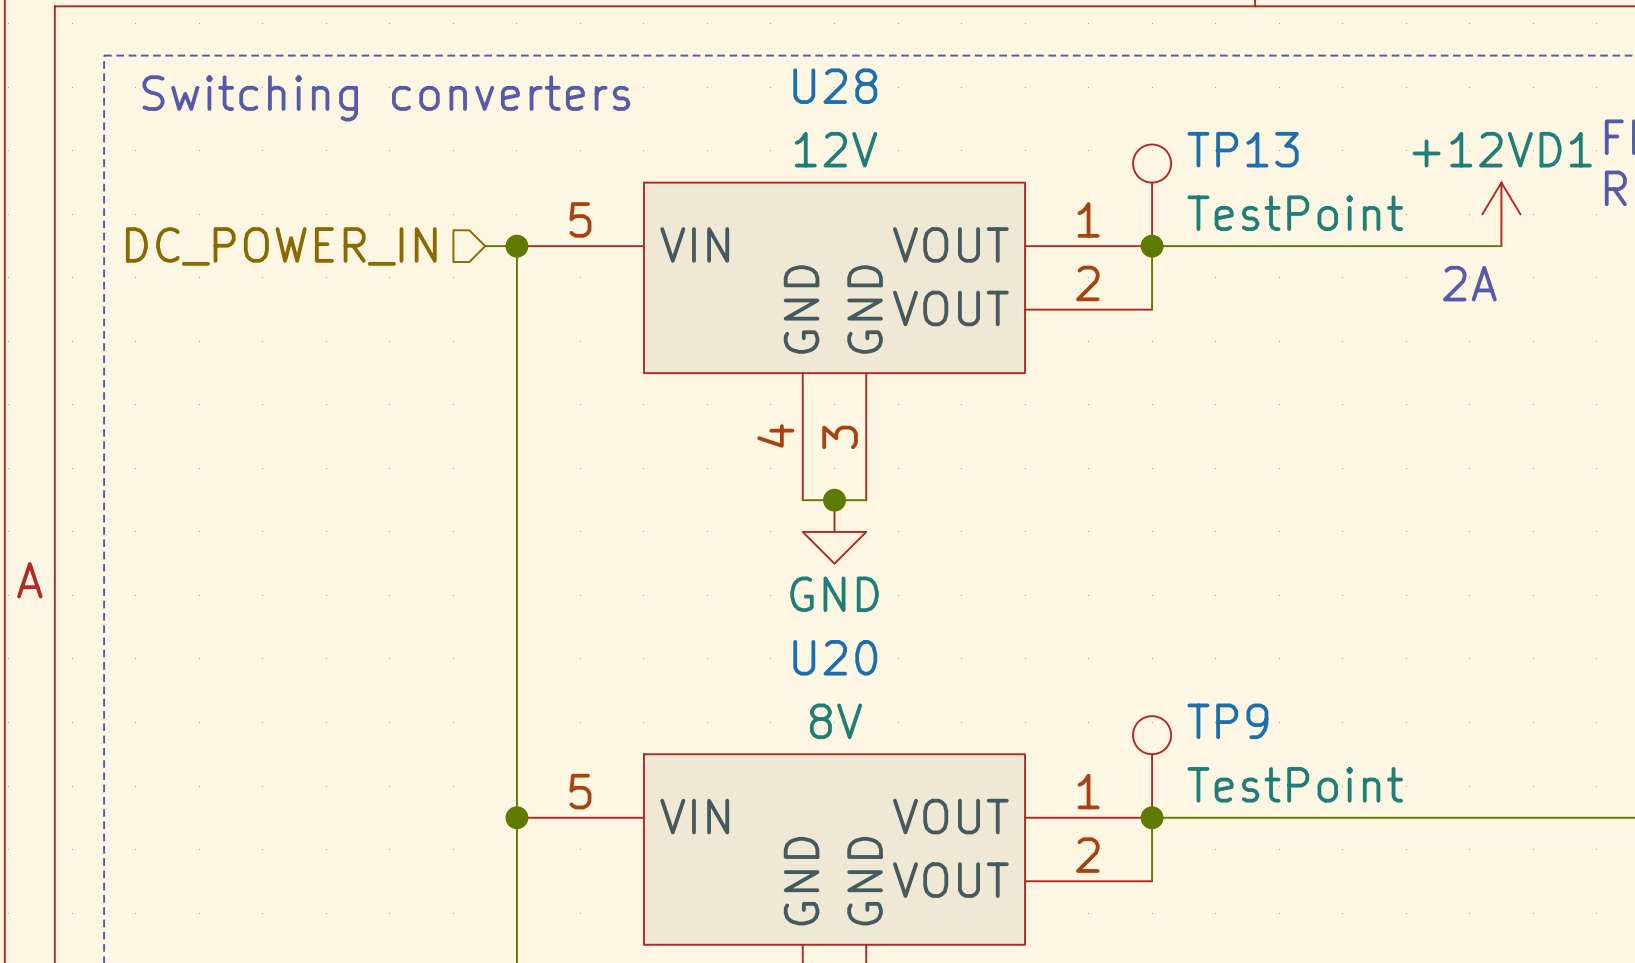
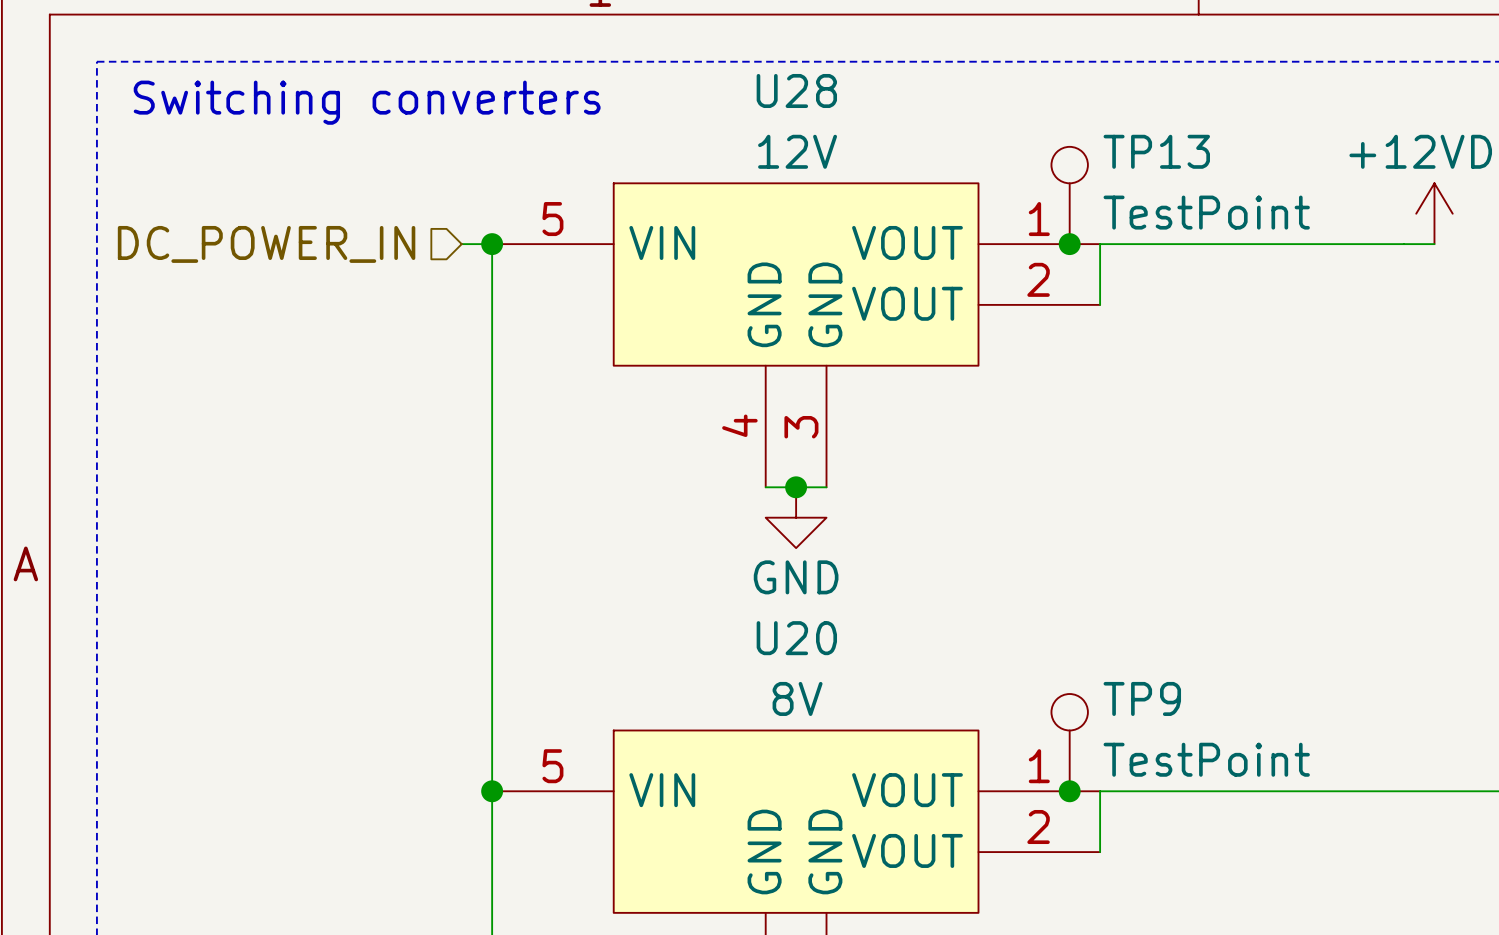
TP13 position: (1152, 195) -> (1069, 195)
junction position: (1152, 246) -> (1069, 244)
text: 2A (1469, 283) -> none
TP9 position: (1152, 766) -> (1069, 742)
junction position: (1152, 817) -> (1069, 791)

